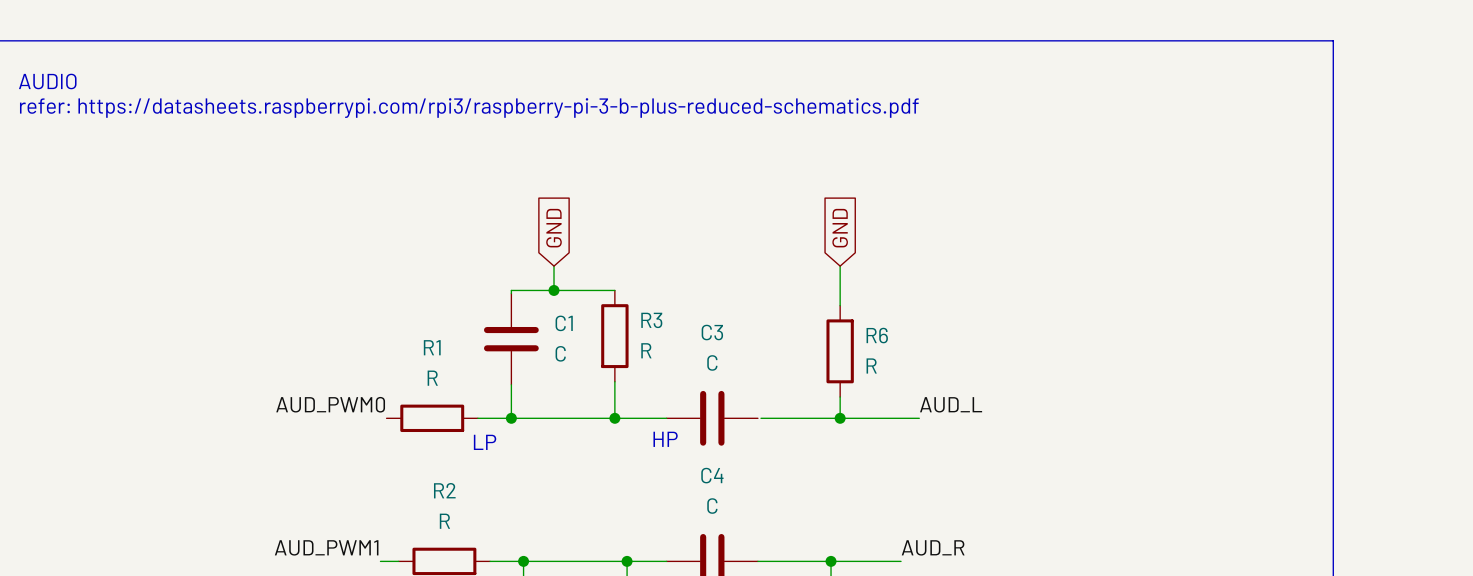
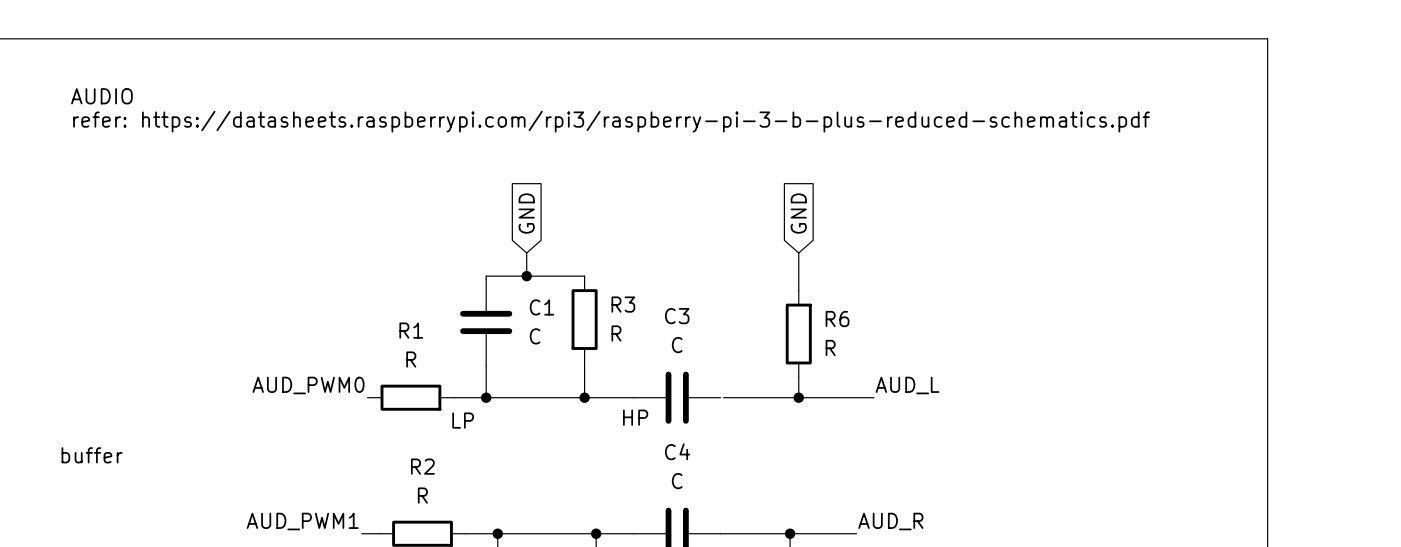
text position: AUDIO (47, 81) -> AUDIO (101, 96)
text position: refer: https://datasheets.raspberrypi.com/rpi3/raspberry-pi-3-b-plus-reduced-schematics.pdf (469, 108) -> refer: https://datasheets.raspberrypi.com/rpi3/raspberry-pi-3-b-plus-reduced-schematics.pdf (611, 121)
text: none -> buffer (92, 455)

